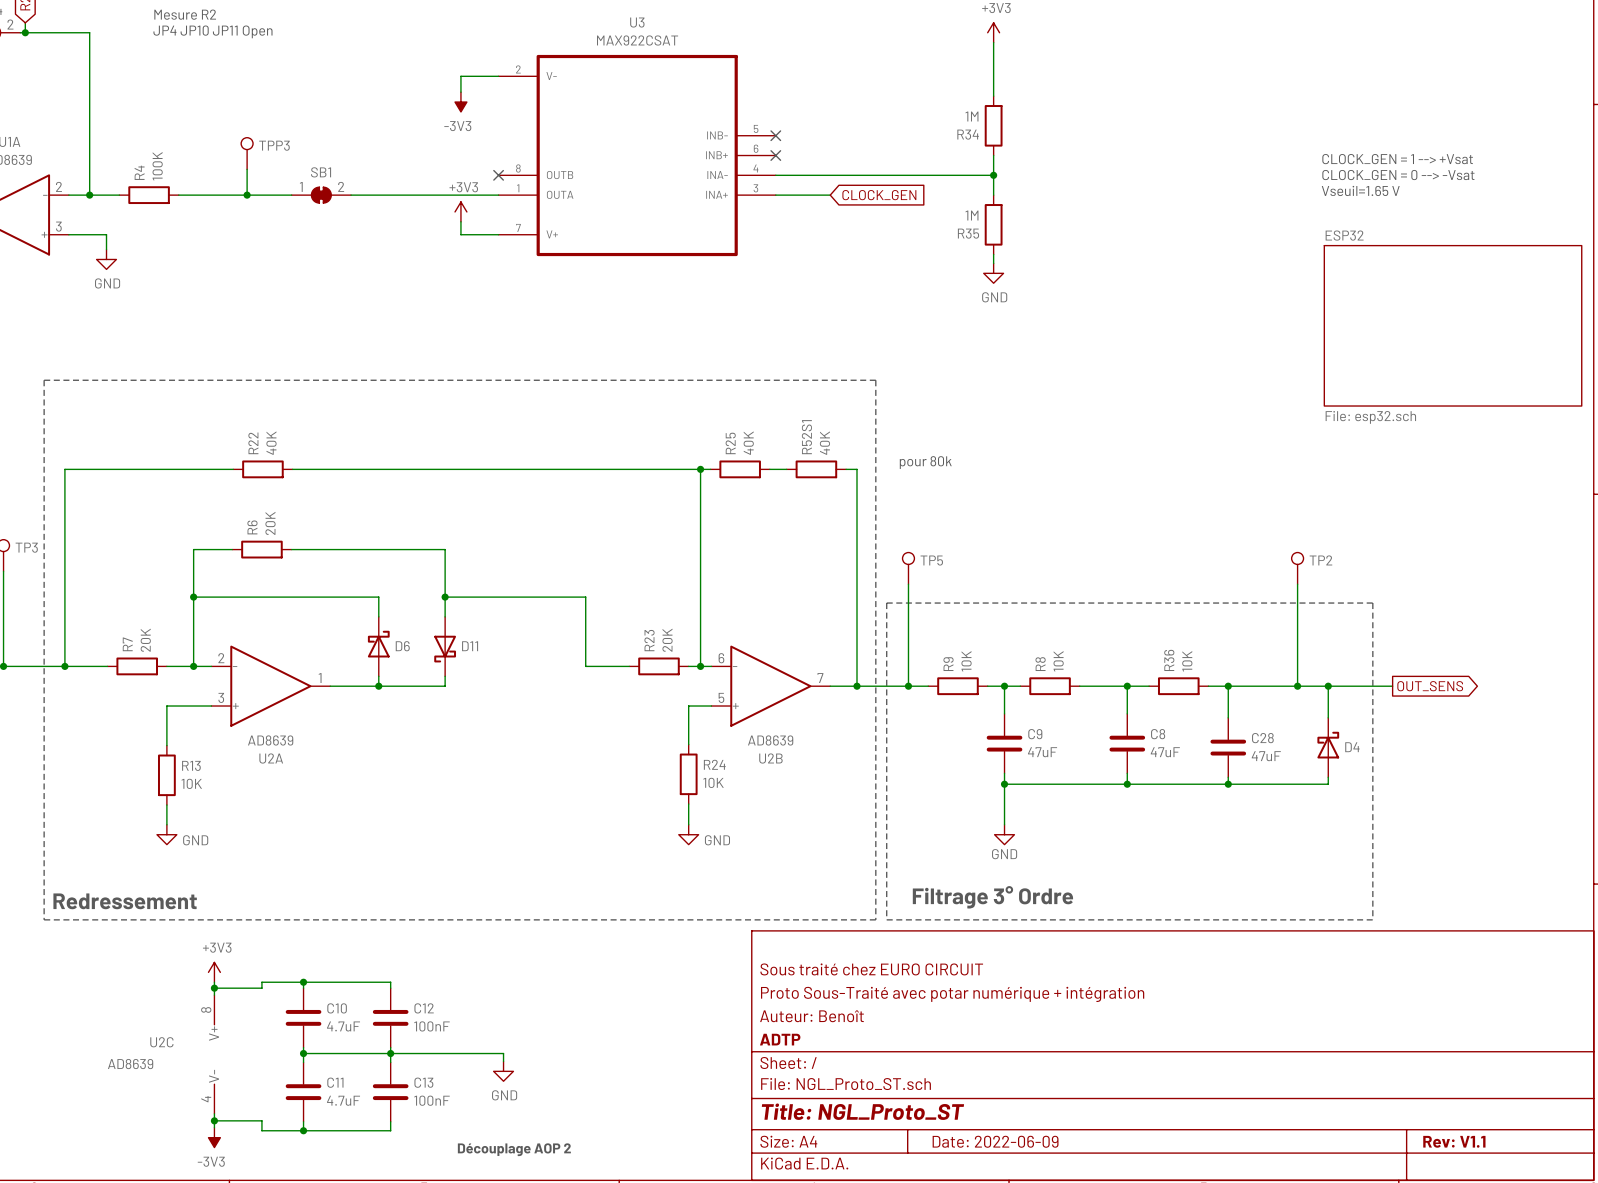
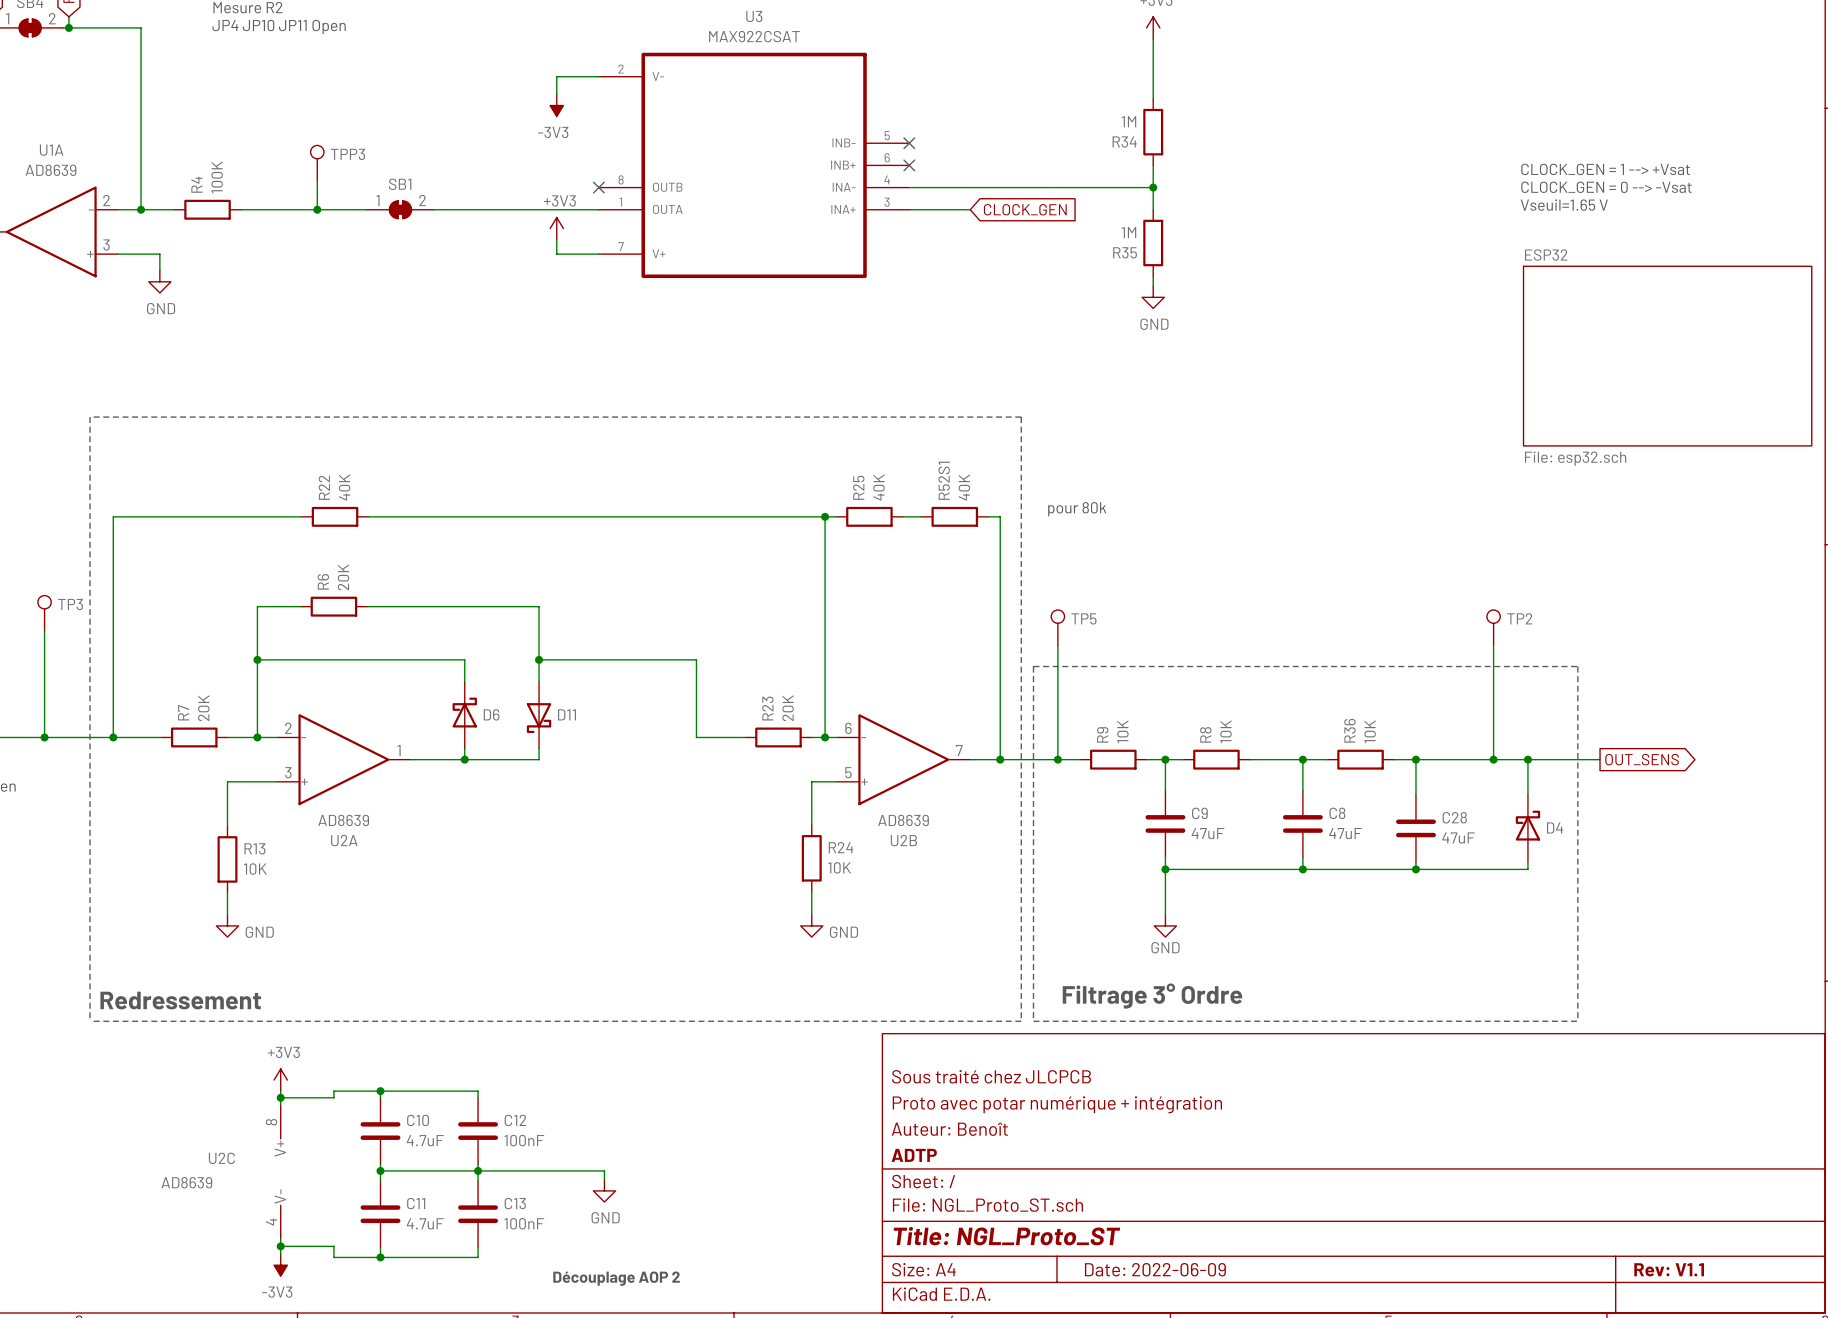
title block: Sous traité chez EURO CIRCUIT (871, 969) -> Sous traité chez JLCPCB (991, 1076)
title block: Proto Sous-Traité avec potar numérique + intégration (952, 994) -> Proto avec potar numérique + intégration (1057, 1104)

